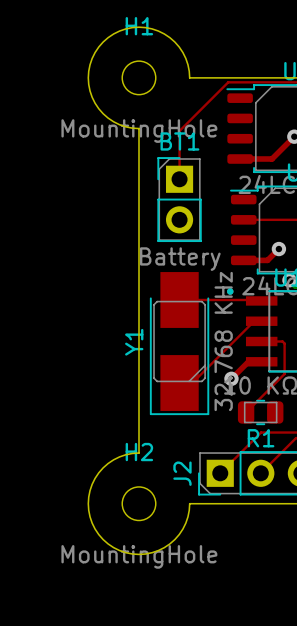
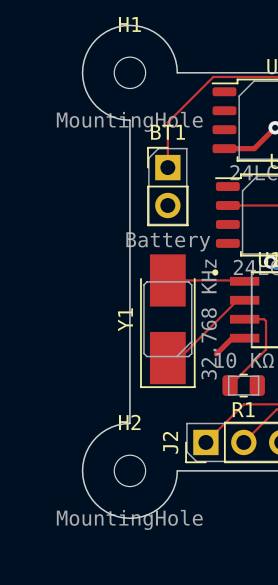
top track: (278, 249) (267, 260) (243, 260) -> none
via: (278, 249) -> none
via: (231, 378) -> none

